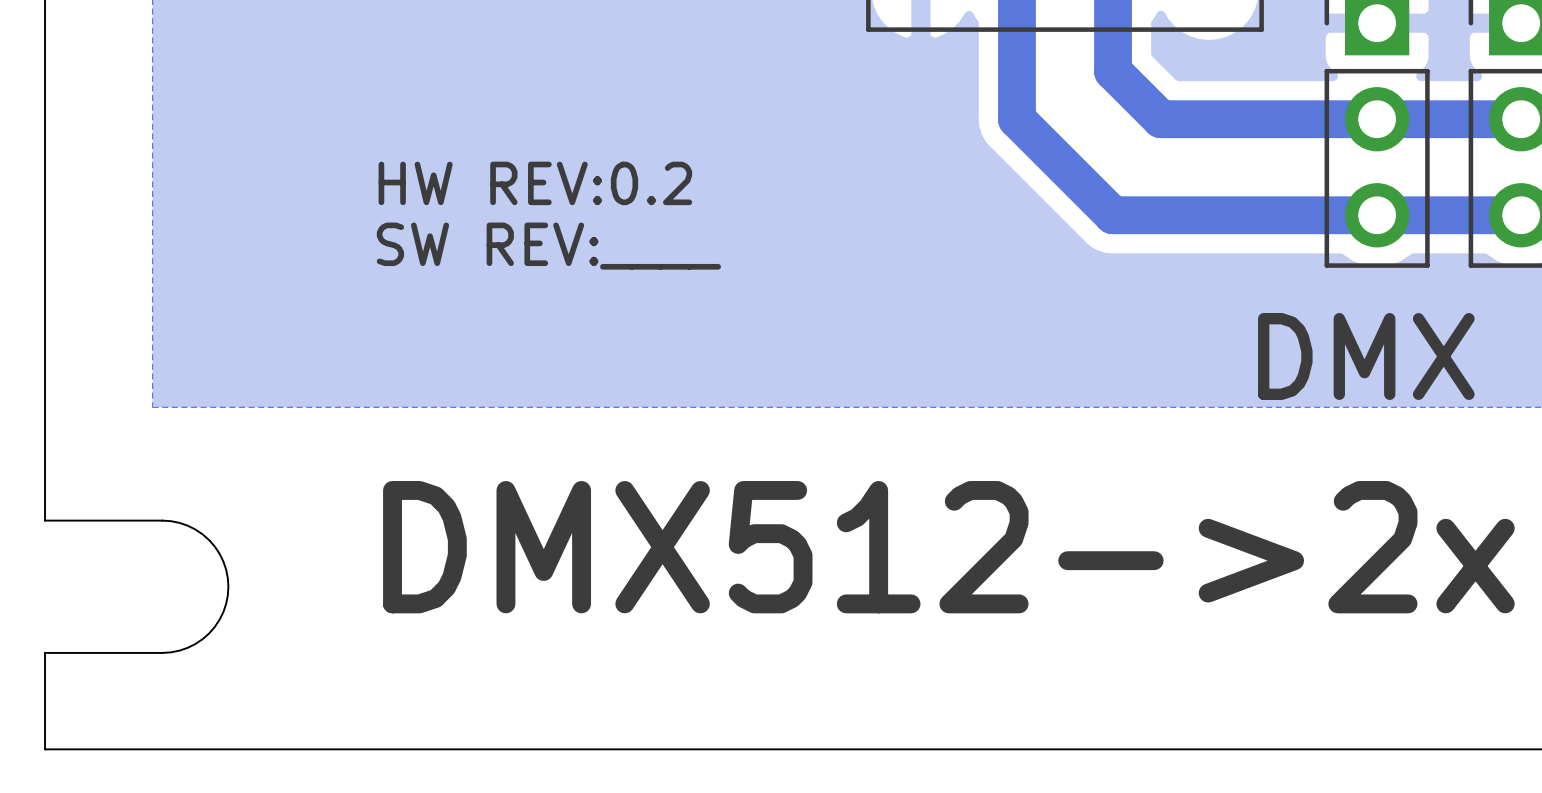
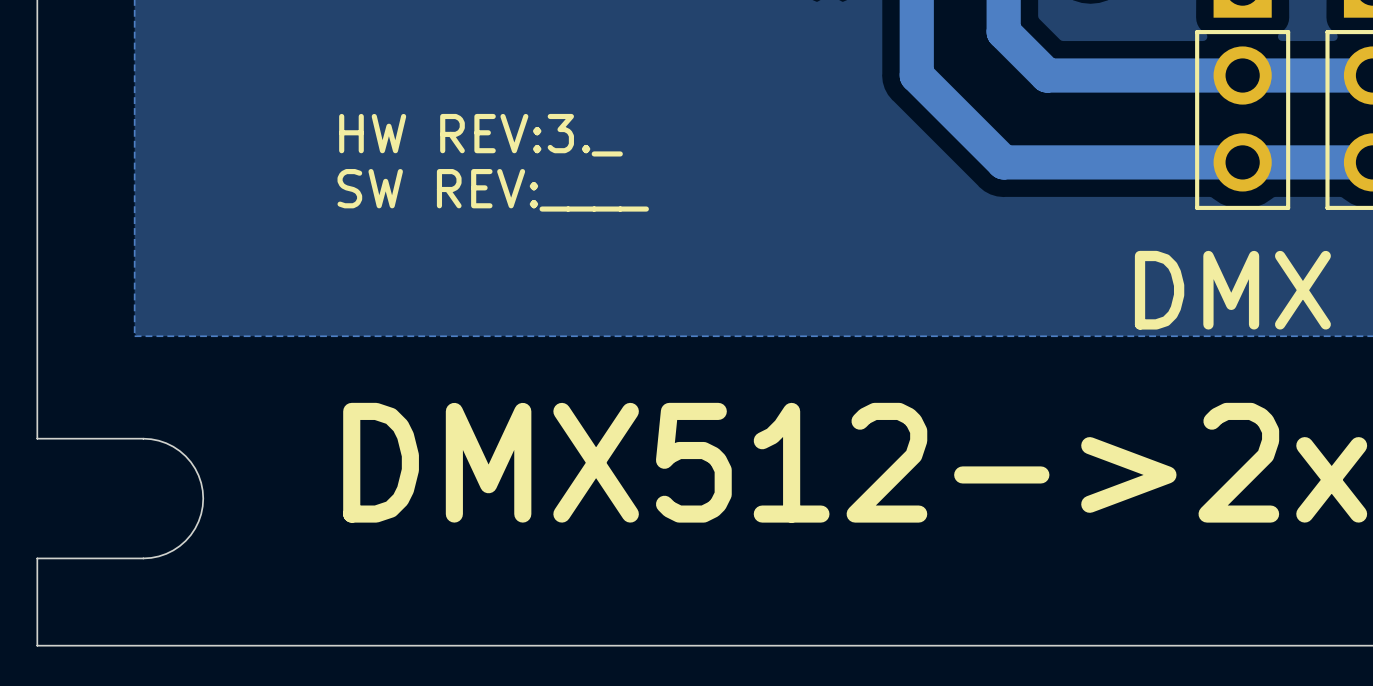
text: HW REV:0.2 (535, 183) -> HW REV:3._ (481, 135)

